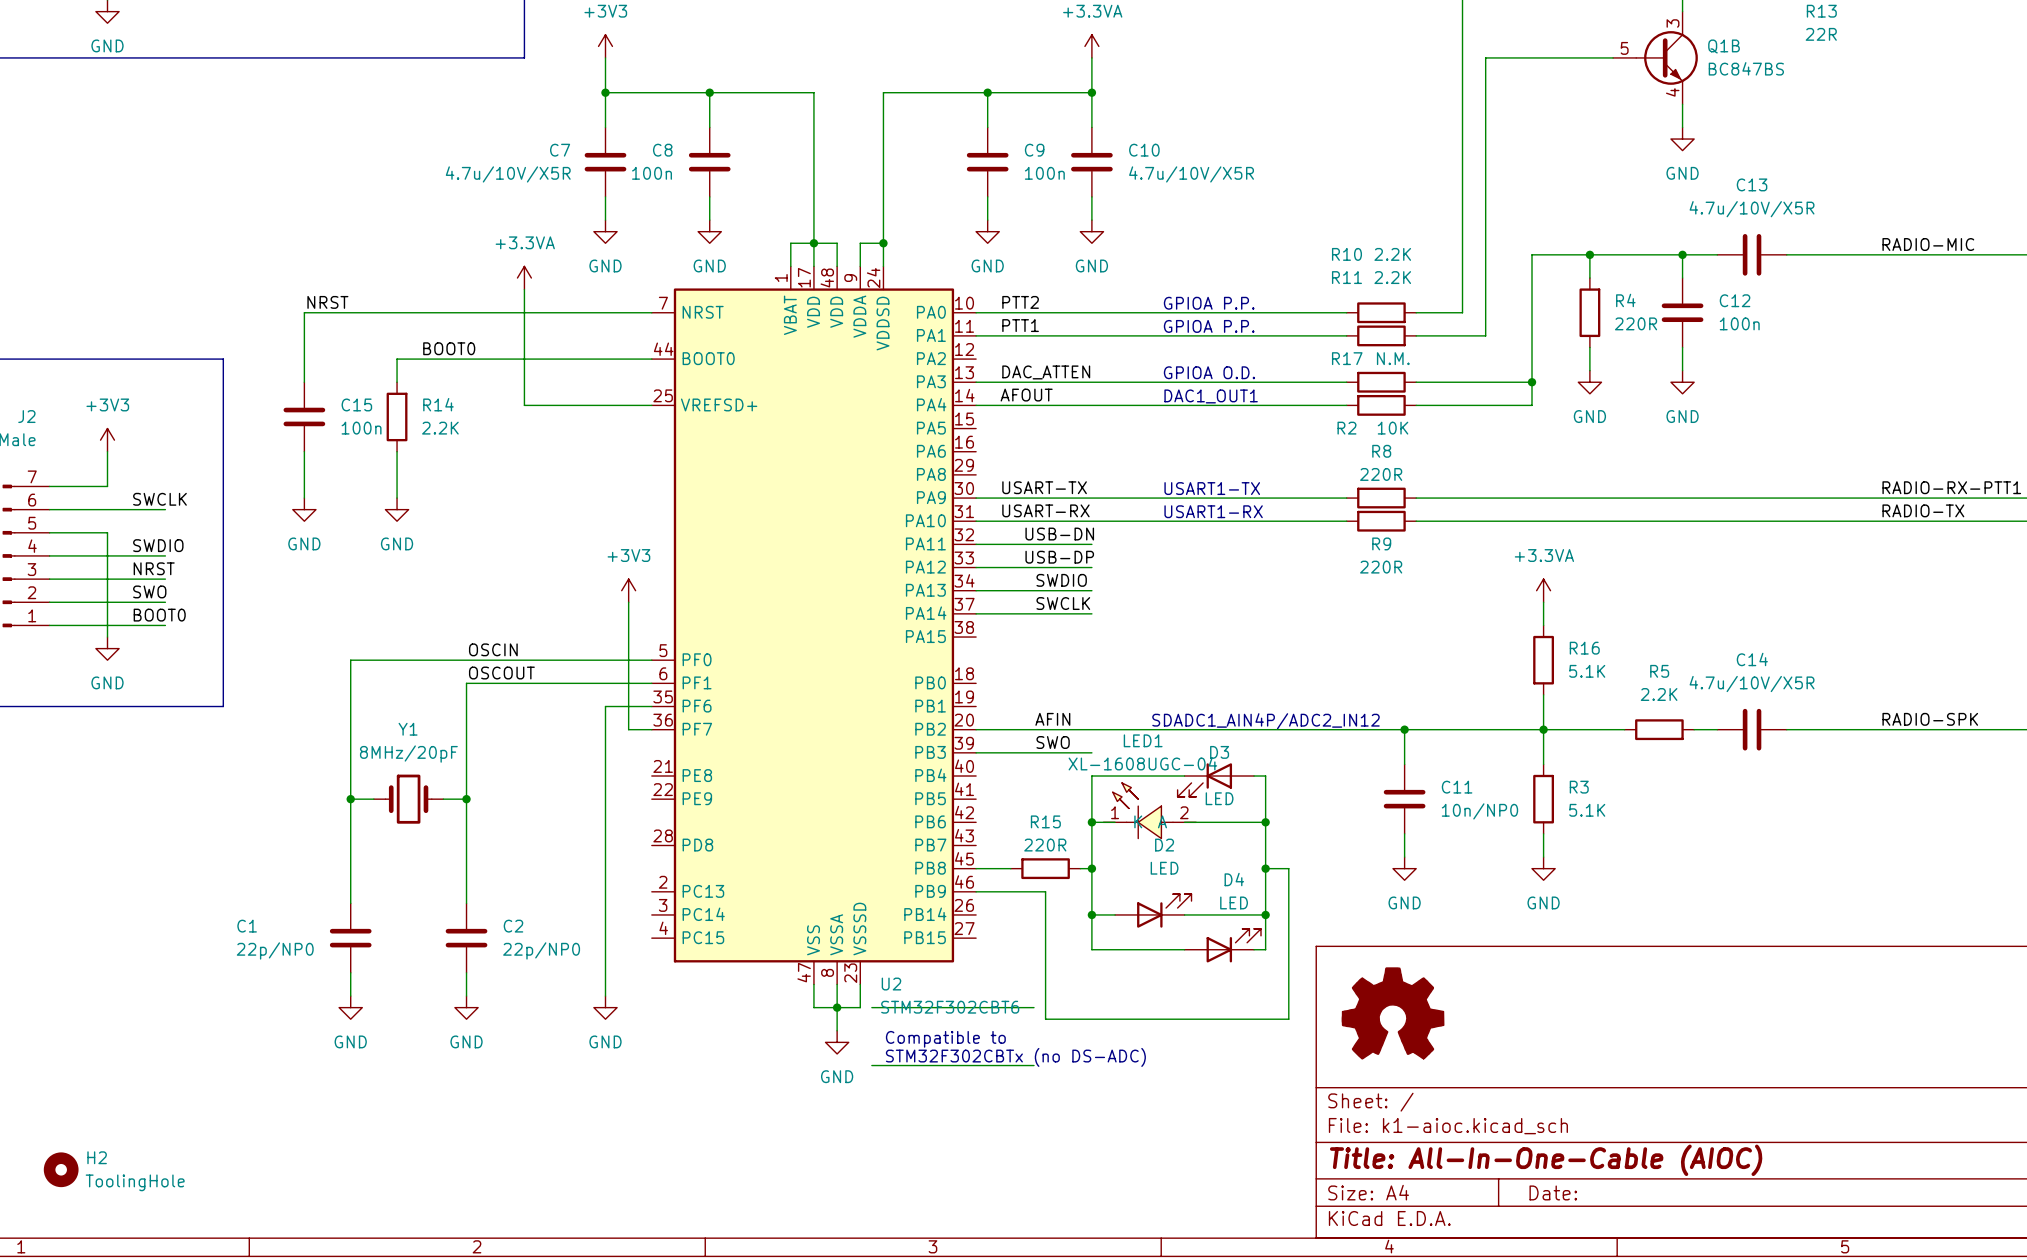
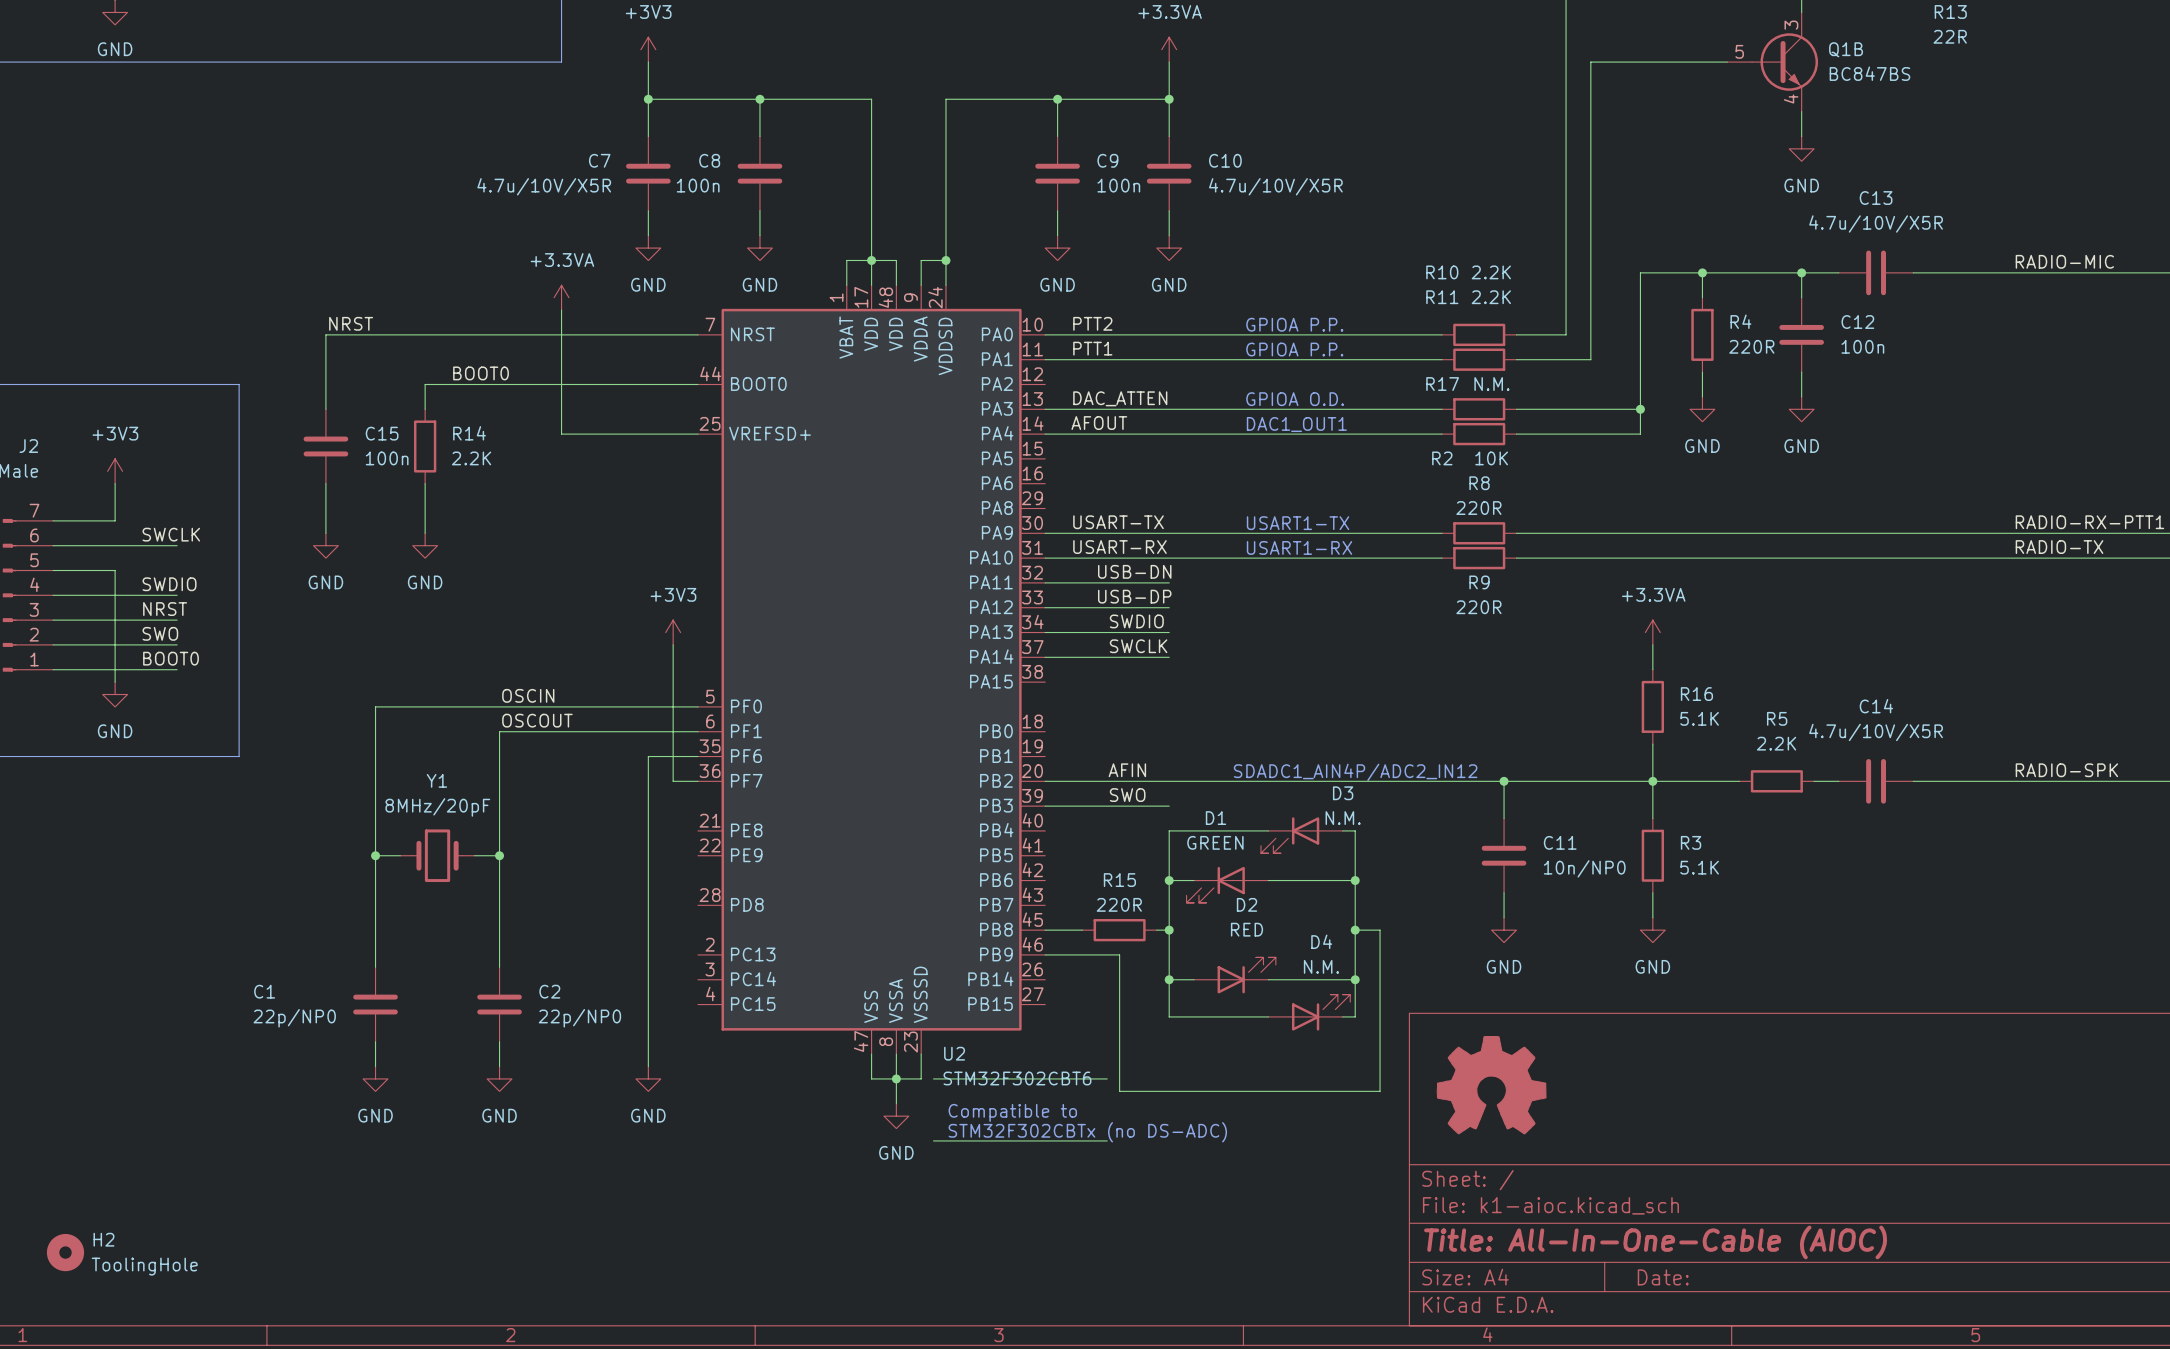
D3 name position: D3 (1219, 752) -> D3 (1343, 793)
D3 value: LED (1219, 798) -> N.M. (1343, 818)
LED1: XL-1608UGC-04 (1149, 810) -> none
D1: none -> GREEN (1227, 884)
D2 value: LED (1164, 868) -> RED (1247, 929)
D4 value: LED (1234, 902) -> N.M. (1321, 966)

